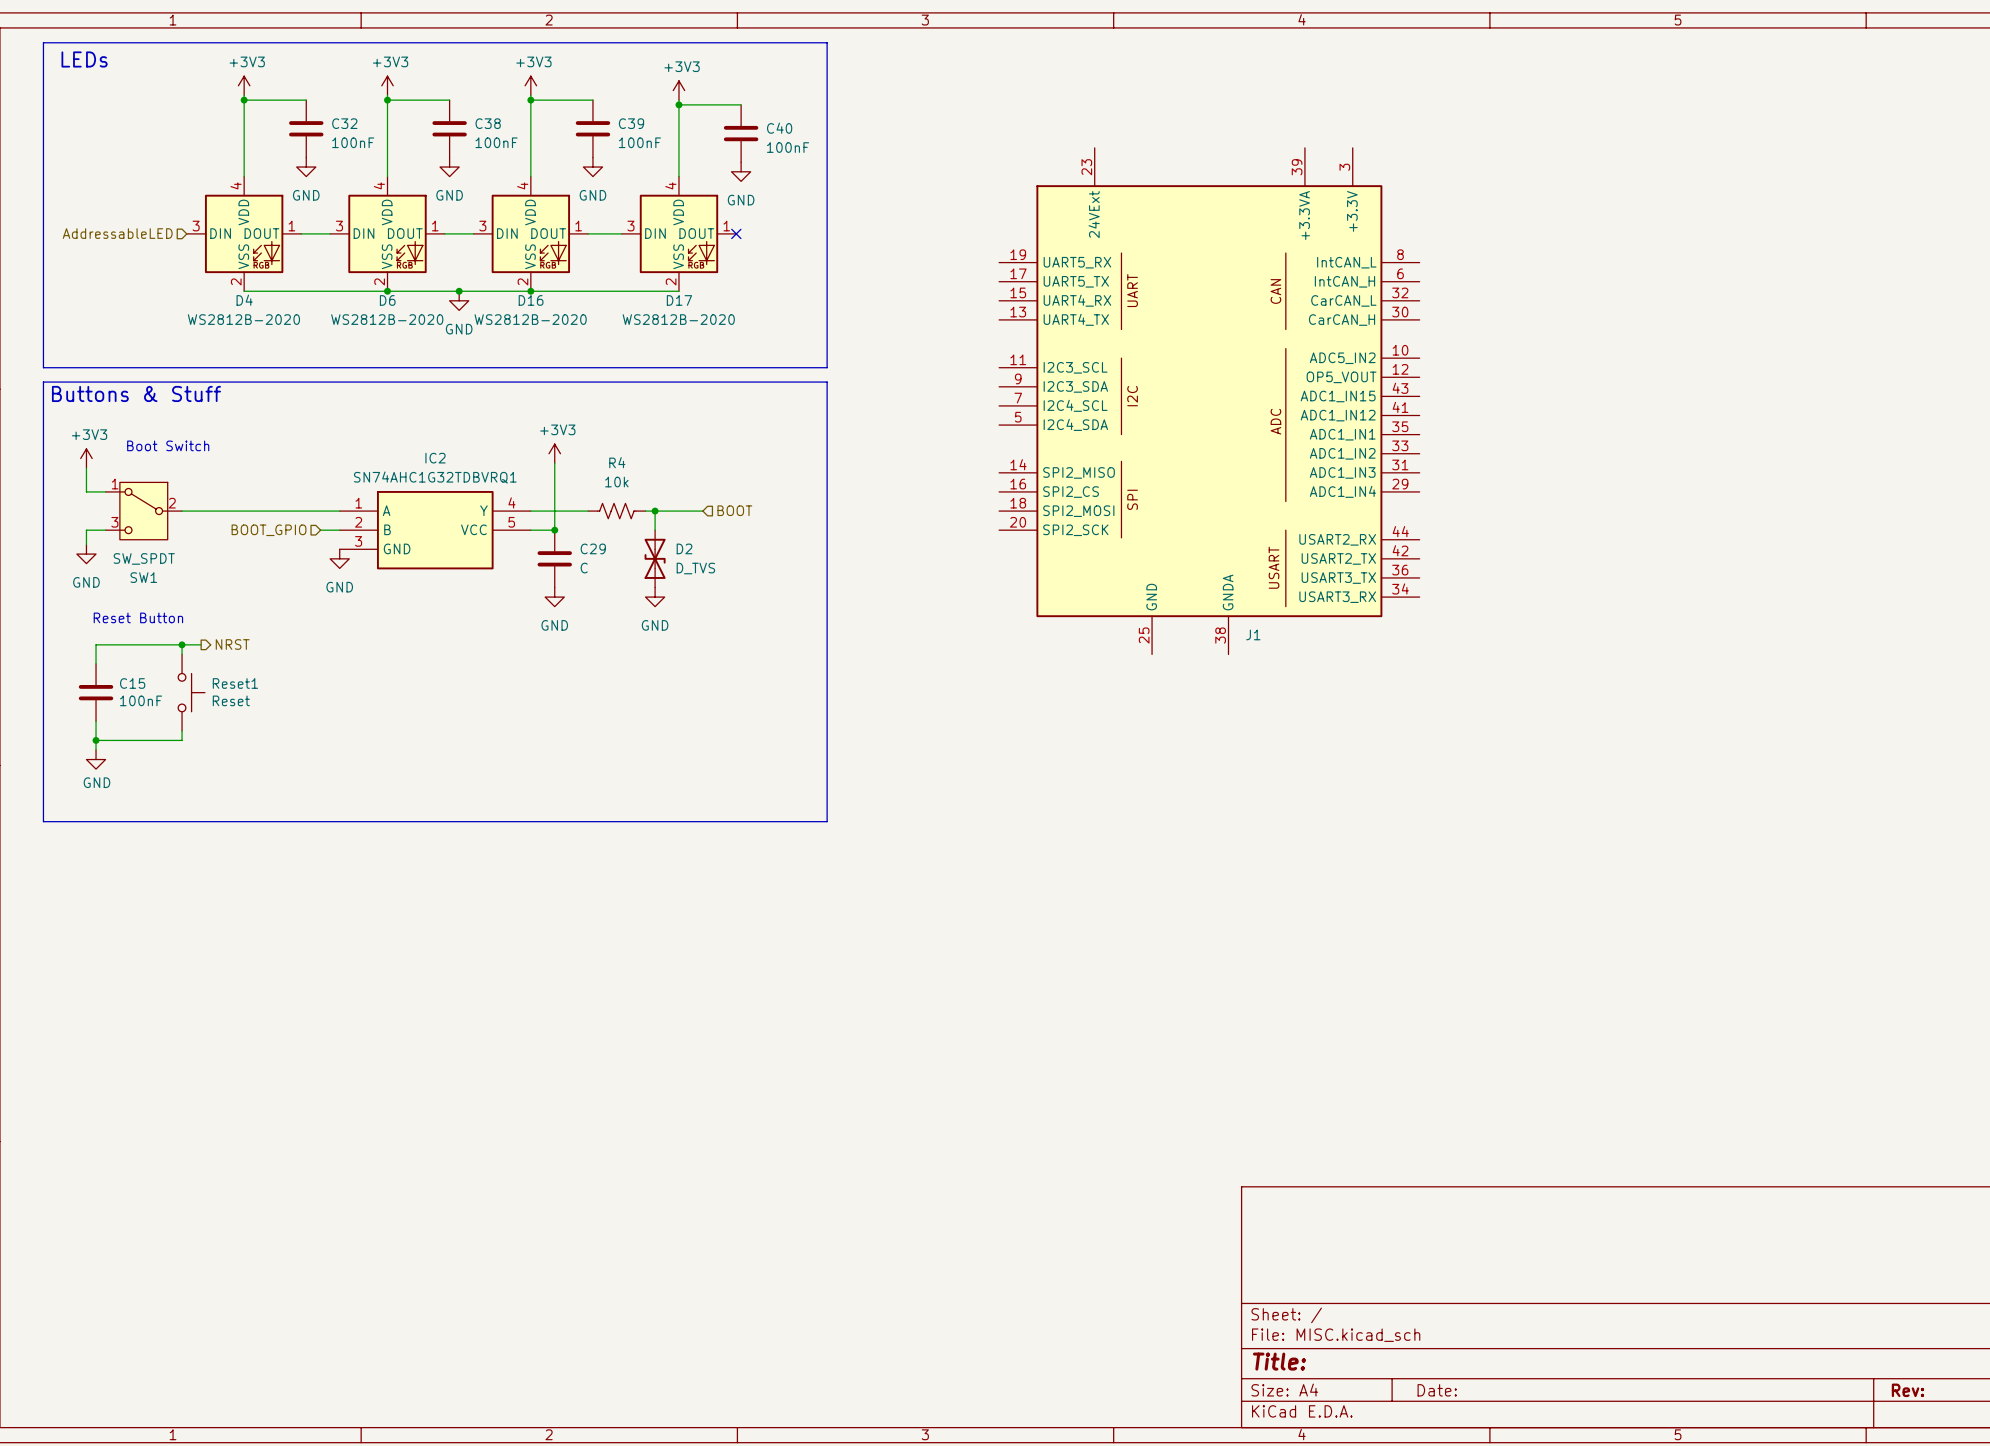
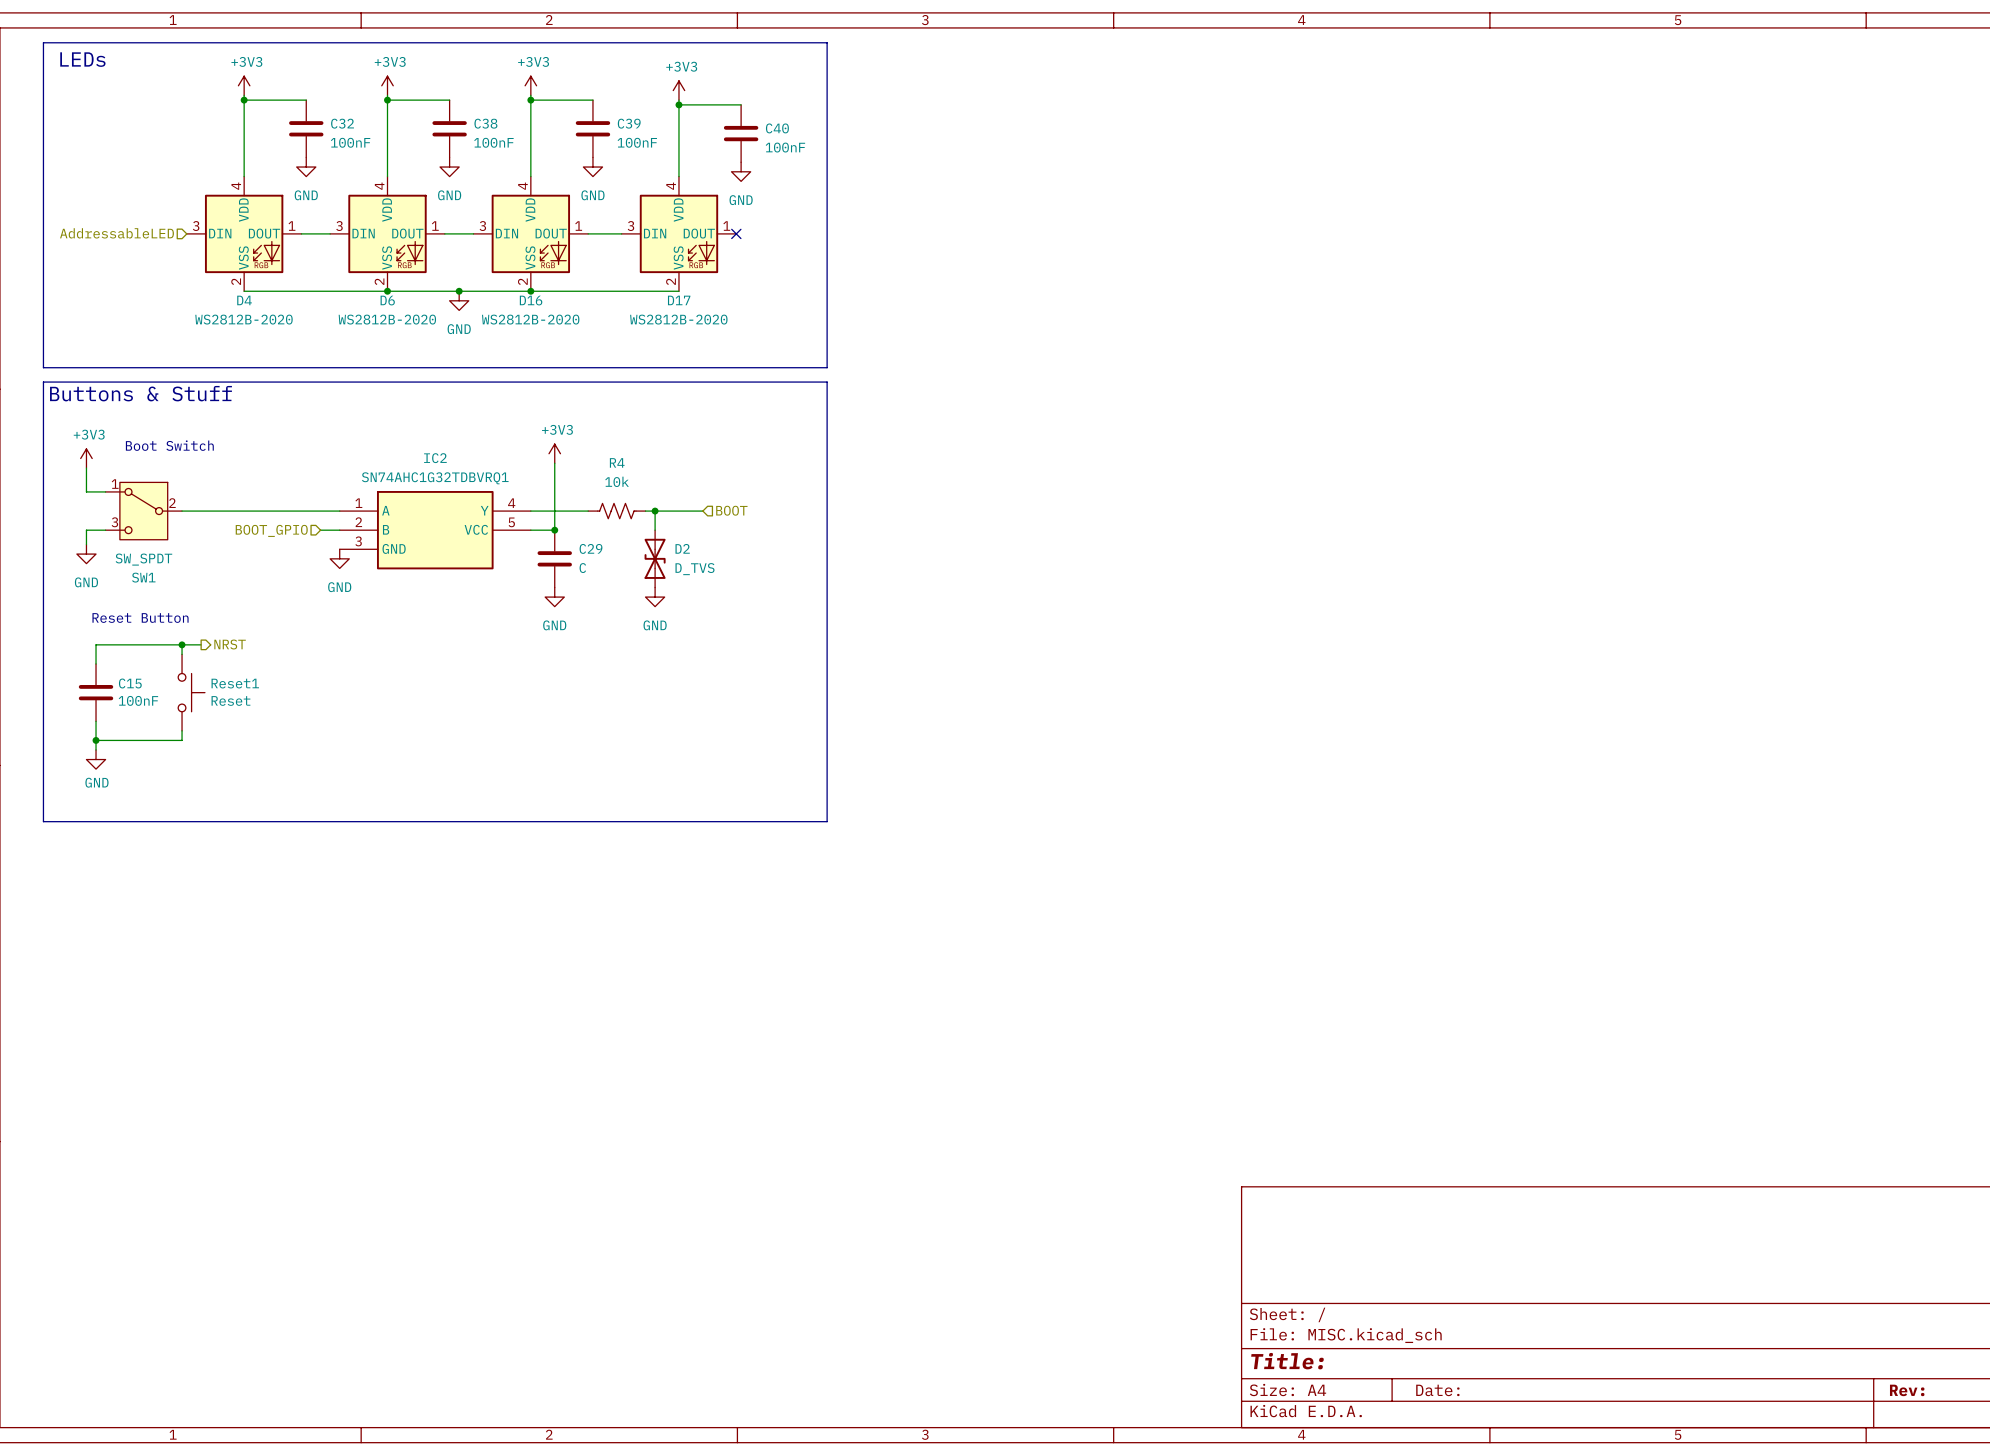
J1: (1209, 401) -> none

